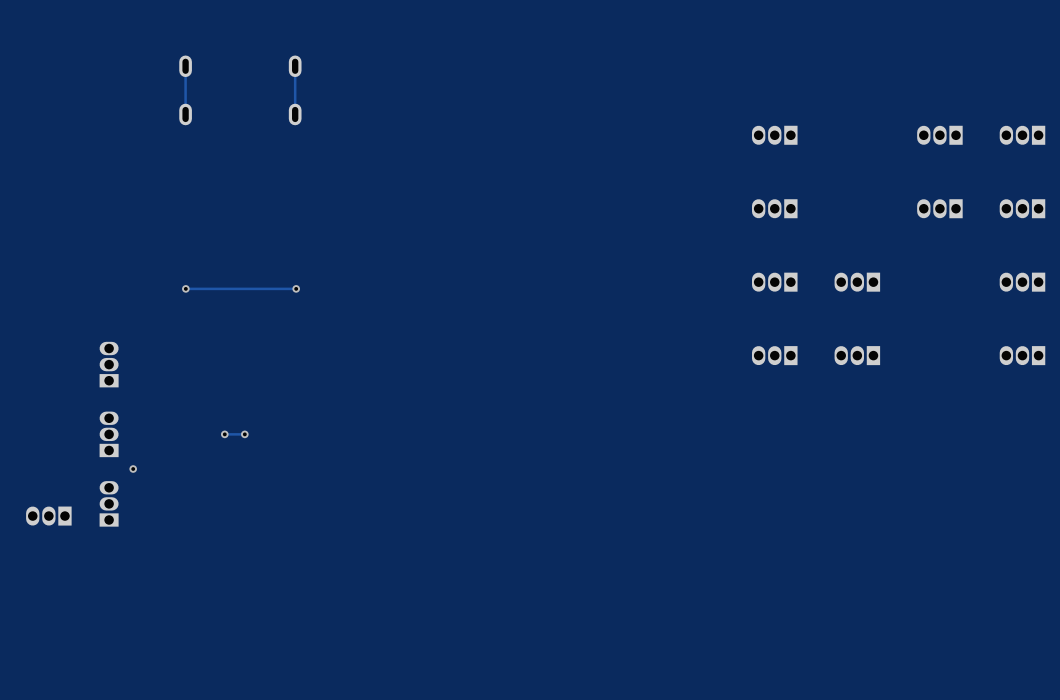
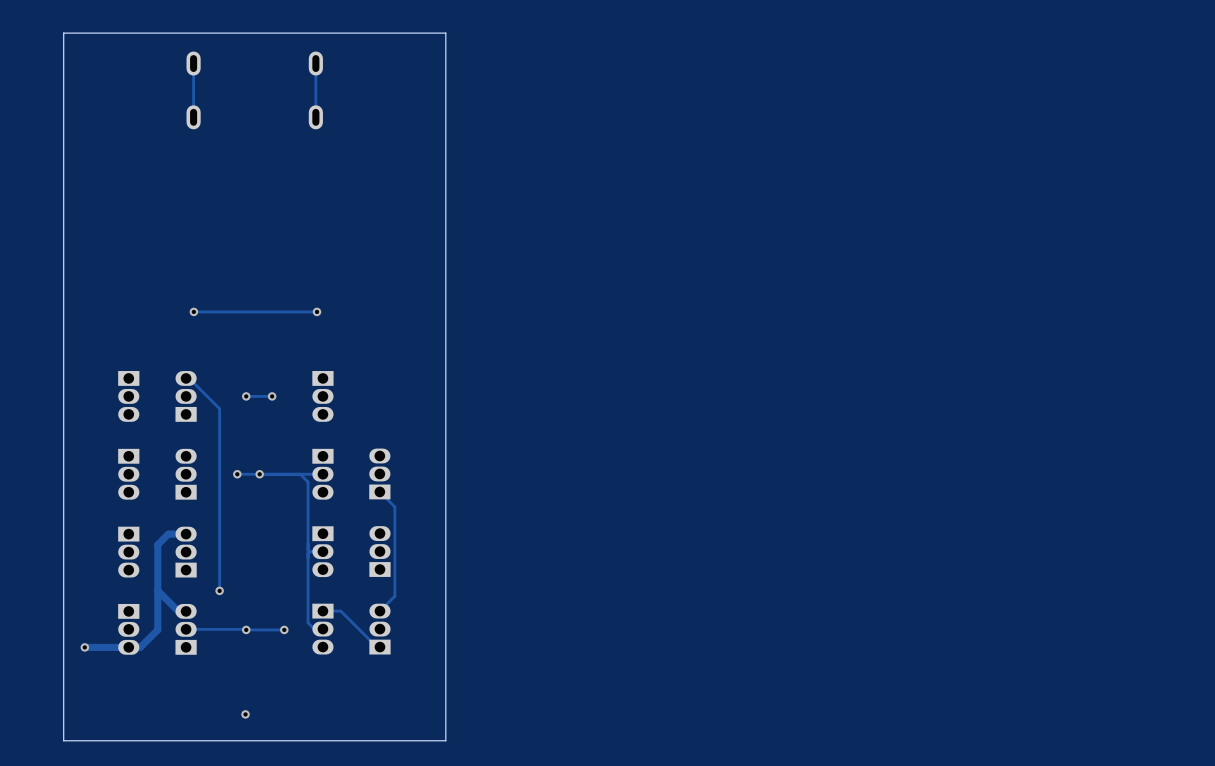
board edge: none -> (445, 33) (63, 33) (63, 740) (445, 740) (445, 33)
part: (774, 135) -> none
part: (939, 135) -> none
part: (1022, 135) -> none
part: (774, 208) -> none
part: (939, 208) -> none
part: (1022, 208) -> none
part: (774, 282) -> none
part: (857, 282) -> none
part: (1022, 282) -> none
track: none -> (186, 378) (189, 378) (219, 408) (219, 590)
part: (774, 355) -> none
part: (857, 355) -> none
part: (1022, 355) -> none
part rotation: 0° (109, 364) -> 180° (128, 396)
part: none -> (186, 396)
via: none -> (246, 396)
track: none -> (272, 396) (246, 396)
via: none -> (272, 396)
part: none -> (322, 396)
part rotation: 0° (109, 434) -> 180° (128, 474)
part: none -> (186, 474)
track: none -> (300, 474) (308, 482) (308, 622) (314, 629) (322, 629)
track: none -> (322, 474) (259, 474)
part: none -> (322, 474)
part: none -> (379, 473)
track: none -> (379, 491) (394, 506) (394, 596) (379, 611)
via: (133, 469) -> none
track: none -> (186, 534) (168, 534) (157, 544) (157, 629) (140, 647) (128, 647)
part rotation: 0° (109, 503) -> 180° (128, 552)
part: none -> (322, 551)
part: none -> (379, 551)
part: none -> (186, 552)
part: (48, 516) -> none
track: none -> (157, 590) (178, 611) (186, 611)
via: none -> (219, 590)
track: none -> (322, 611) (340, 611) (376, 647) (379, 647)
part: none -> (128, 629)
track: none -> (186, 629) (284, 629)
part: none -> (186, 629)
via: none -> (246, 629)
via: none -> (284, 629)
part: none -> (322, 629)
part: none -> (379, 629)
via: none -> (84, 647)
track: none -> (128, 647) (84, 647)
via: none -> (245, 714)

